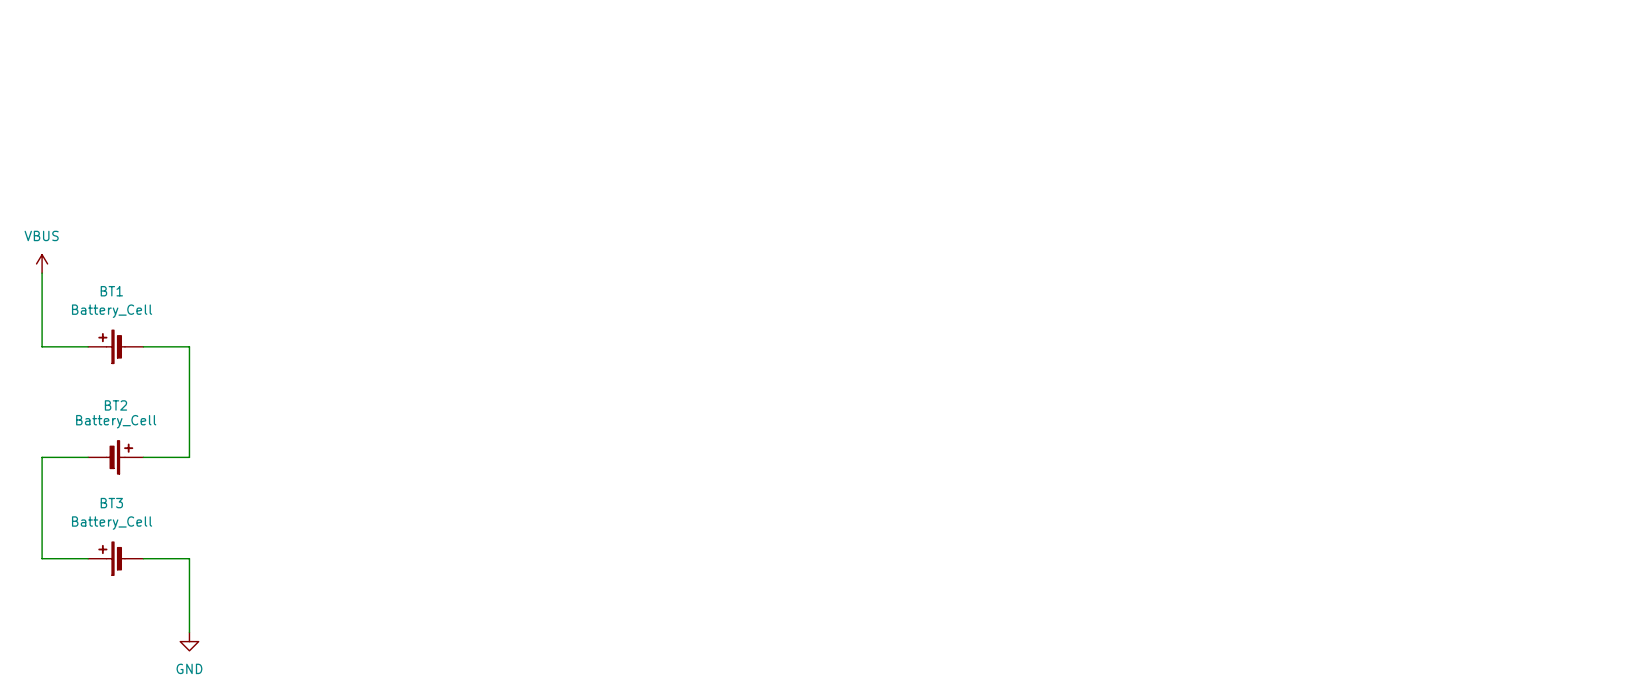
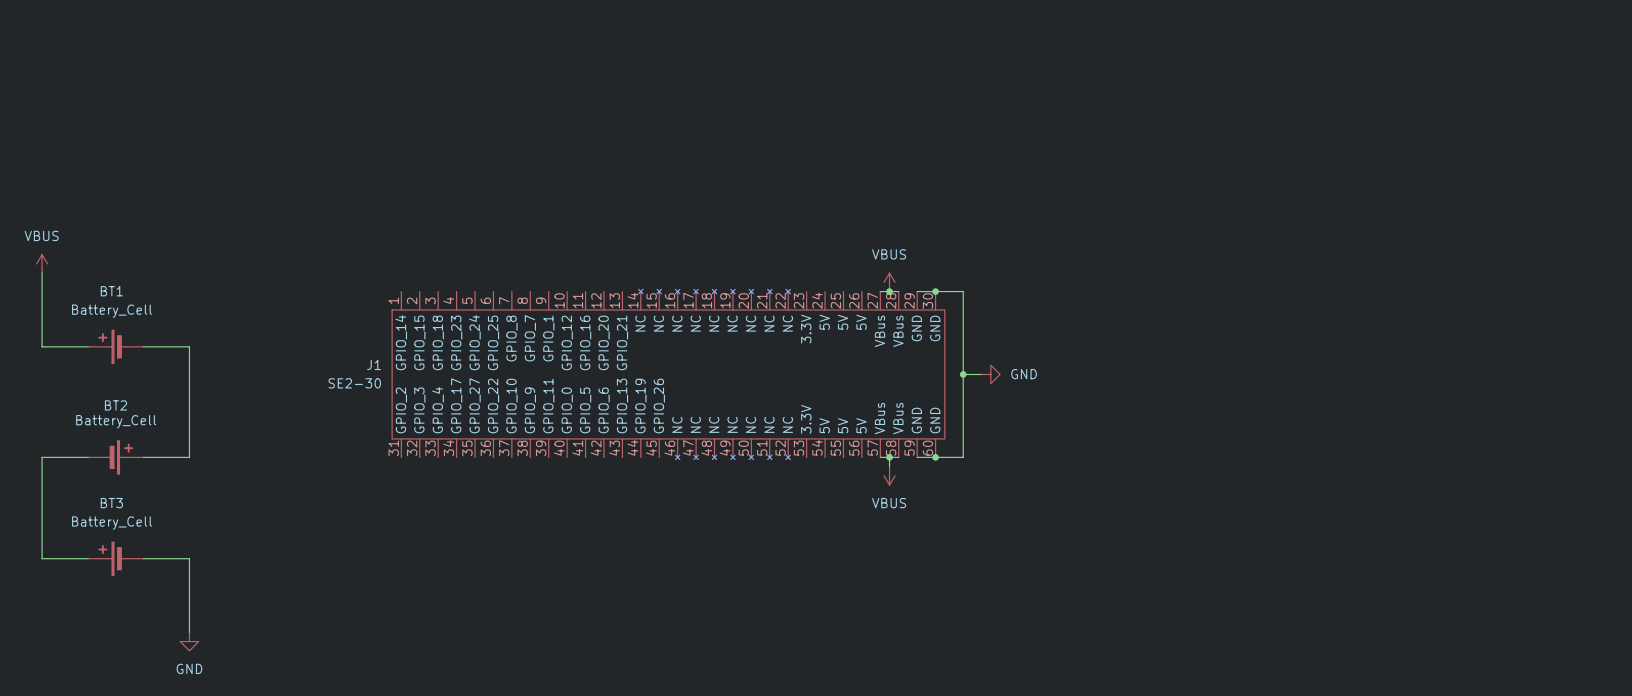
power symbol: none -> VBUS (889, 282)
wire: none -> (880, 291) (898, 291)
junction: none -> (889, 291)
wire: none -> (917, 291) (963, 291) (963, 457) (917, 457)
junction: none -> (935, 291)
J1: none -> SE2-30 (668, 374)
wire: none -> (963, 374) (981, 374)
junction: none -> (963, 374)
power symbol: none -> GND (990, 374)
wire: none -> (880, 457) (898, 457)
wire: none -> (889, 457) (889, 466)
junction: none -> (889, 457)
junction: none -> (935, 457)
power symbol: none -> VBUS (889, 475)

